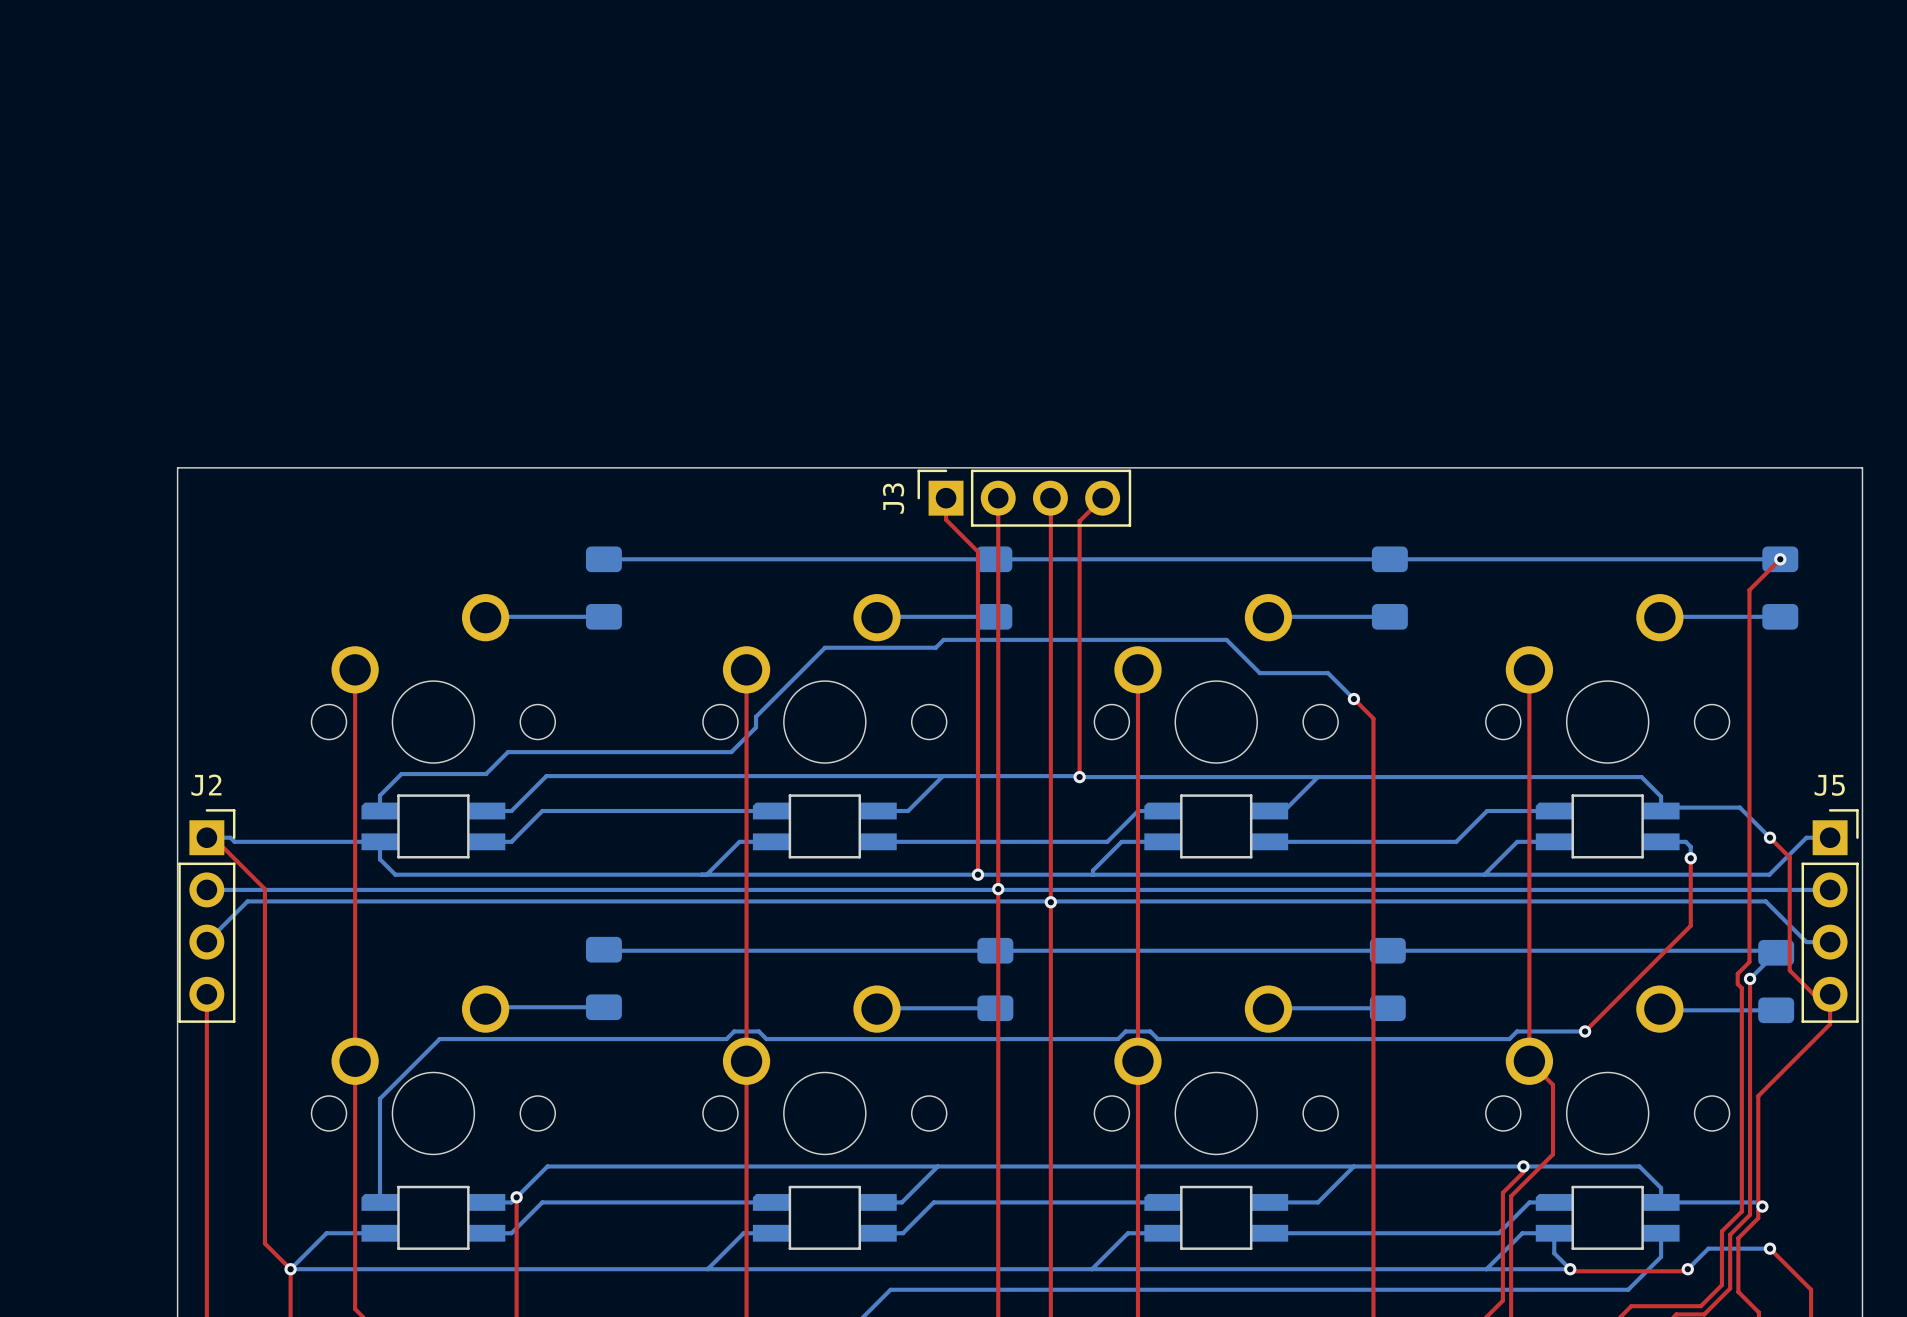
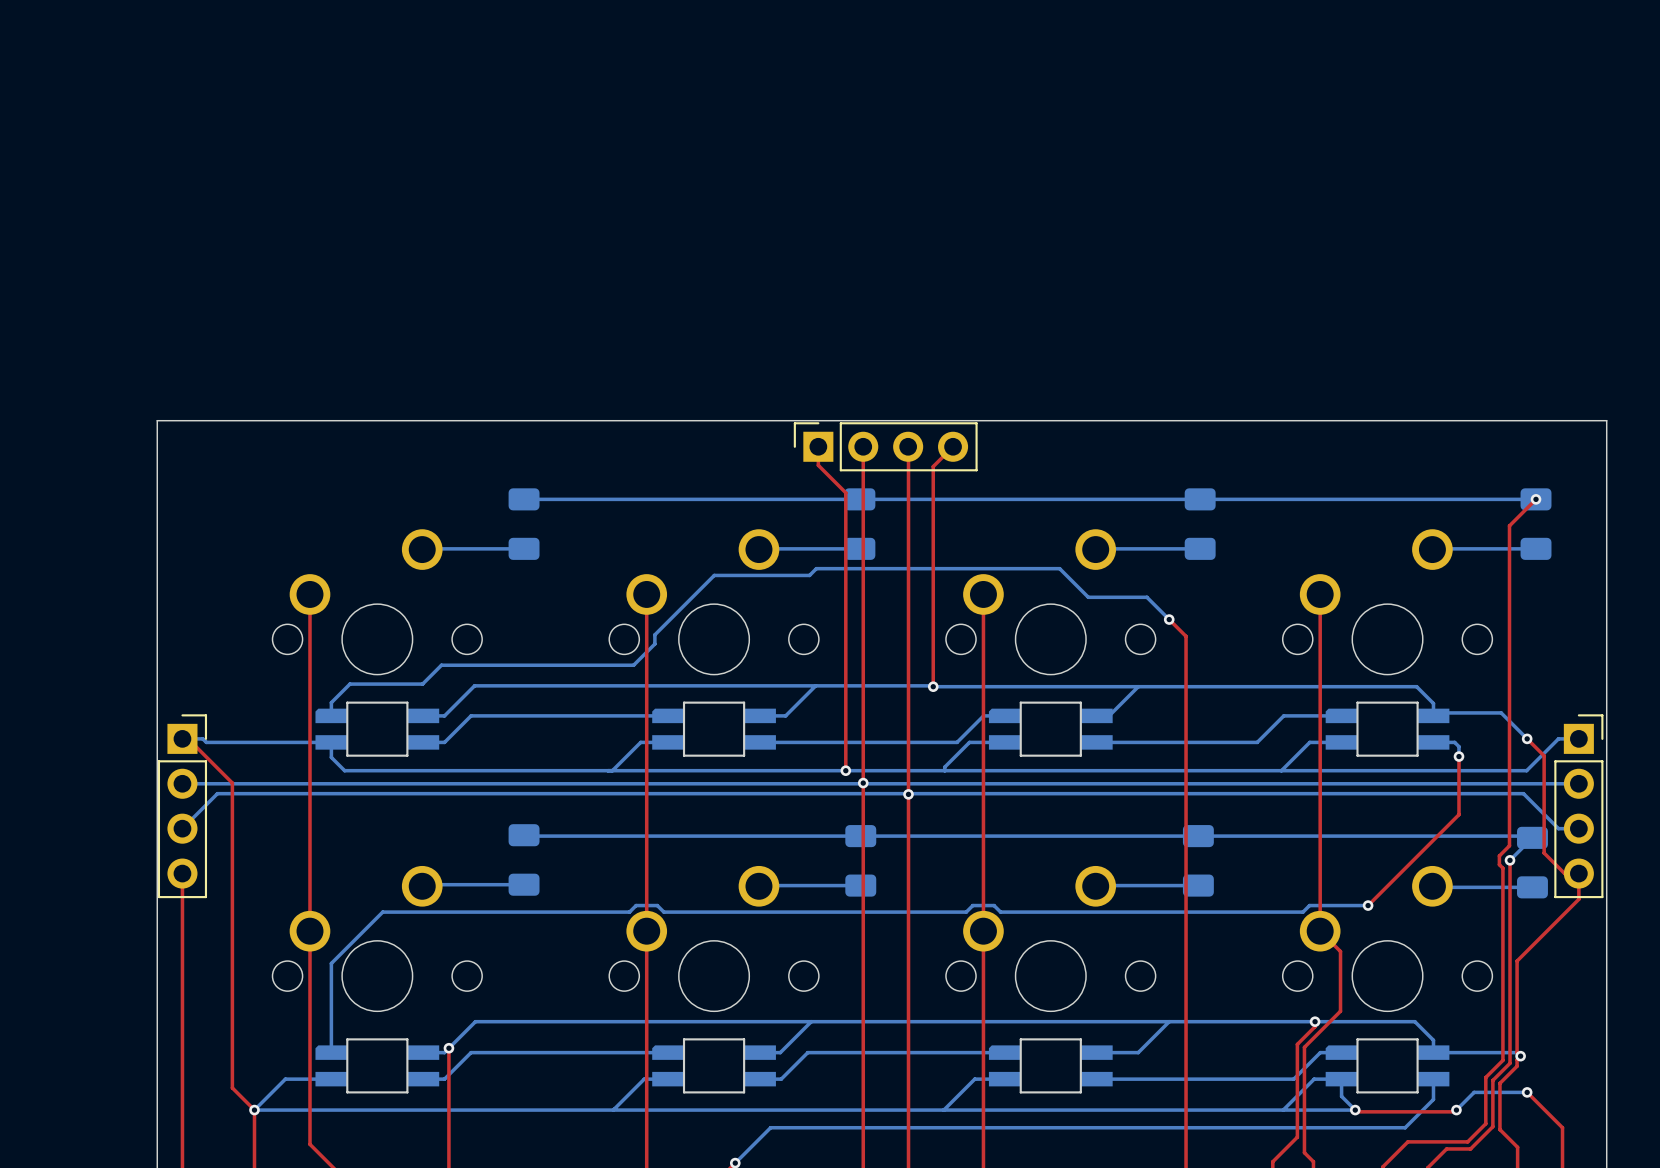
J3 name: J3 (893, 498) -> none
J2 name: J2 (206, 785) -> none
J5 name: J5 (1829, 785) -> none

